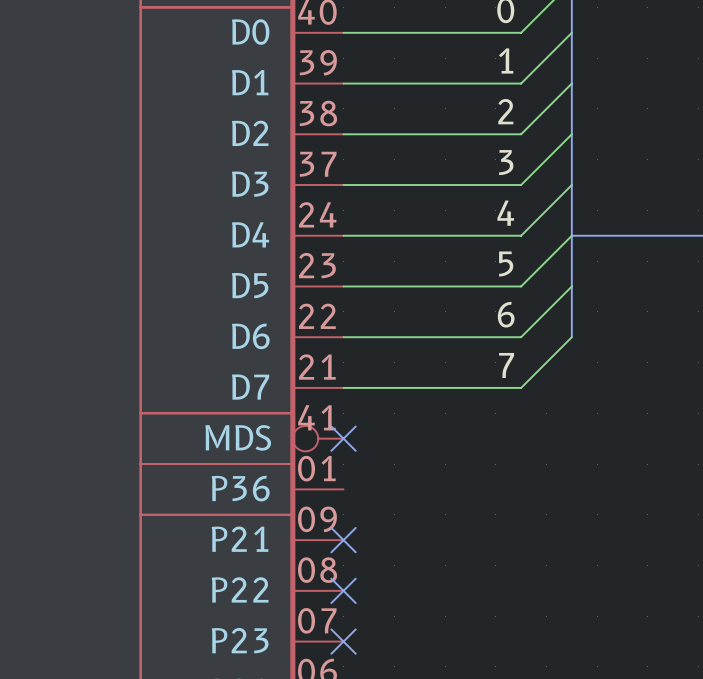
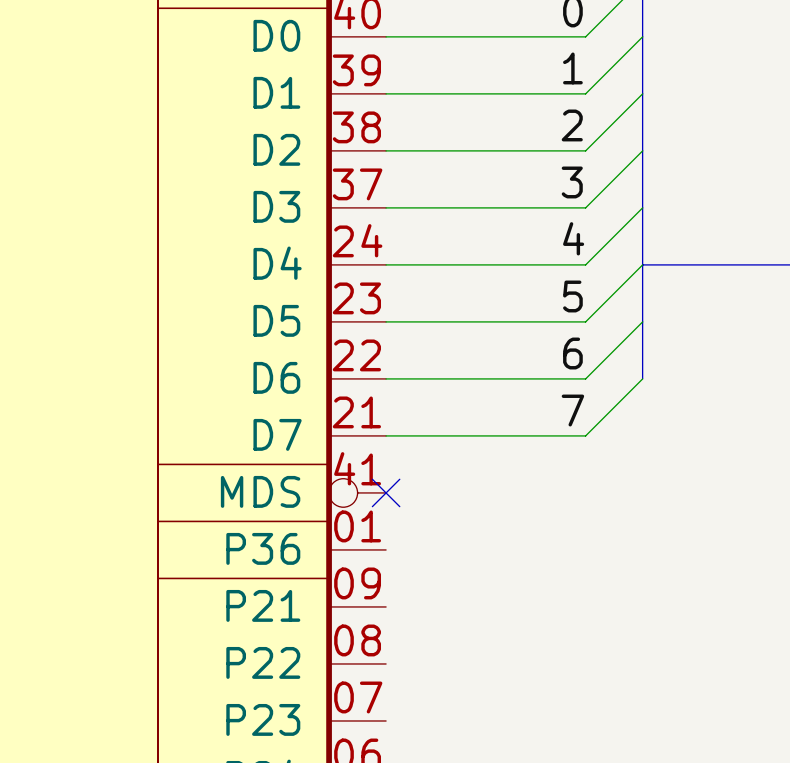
no-connect mark: (343, 540) -> none
no-connect mark: (343, 590) -> none
no-connect mark: (343, 641) -> none

